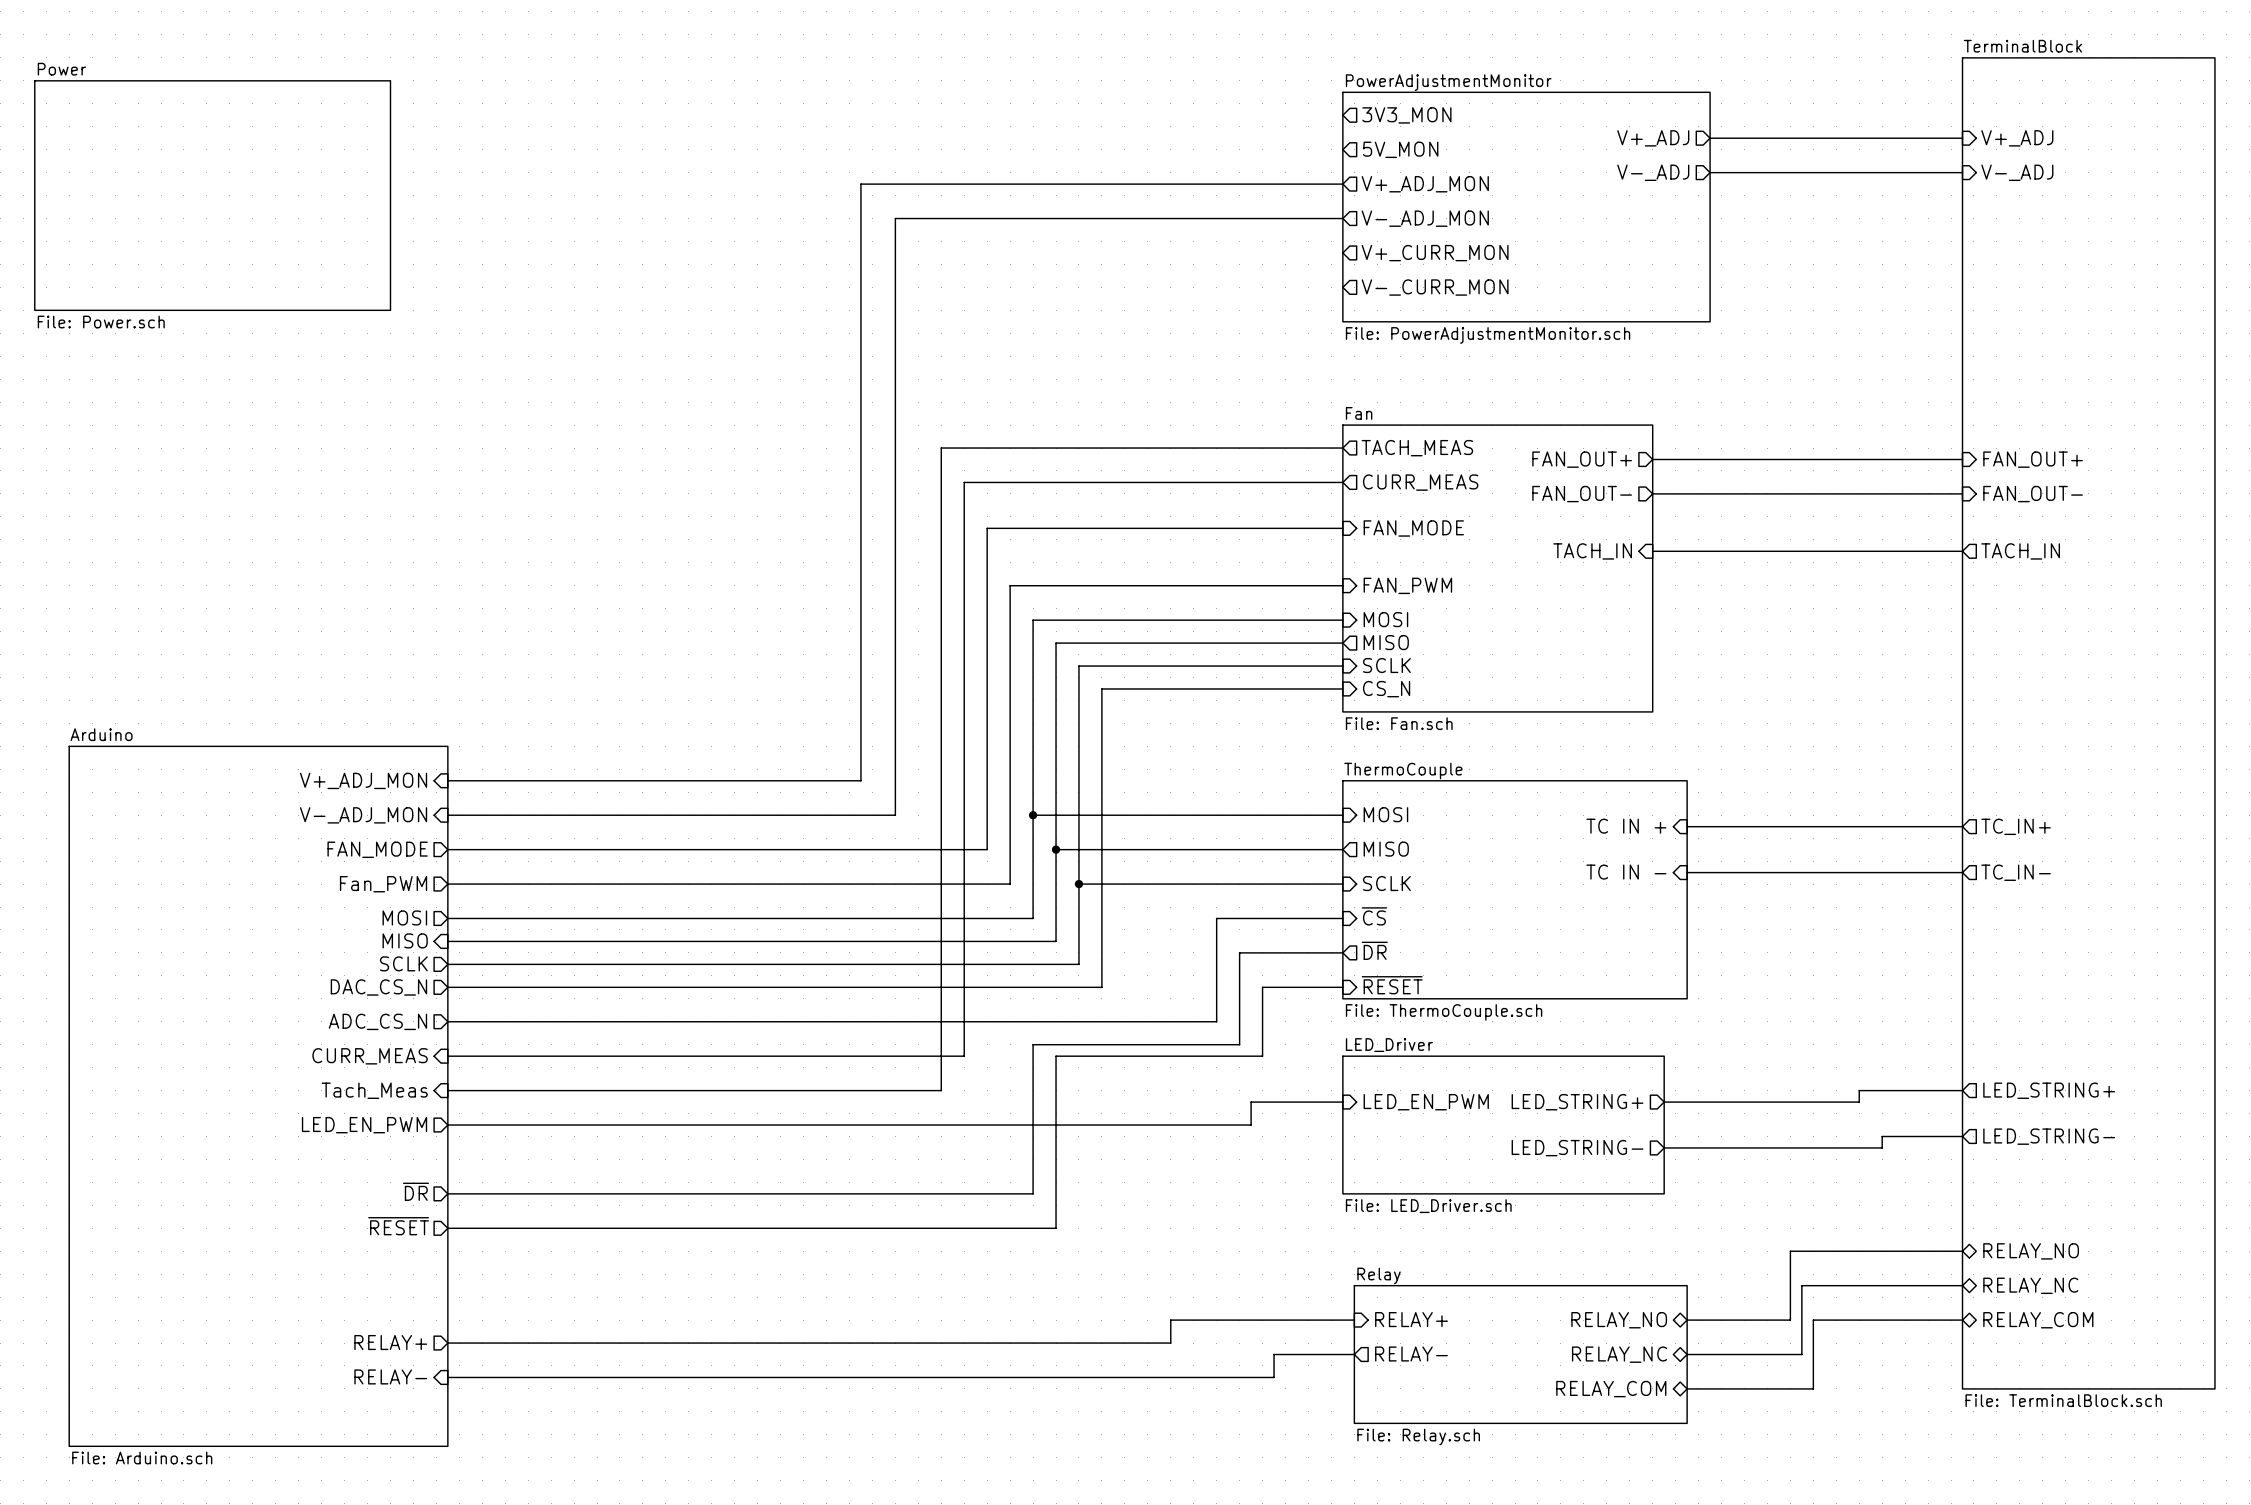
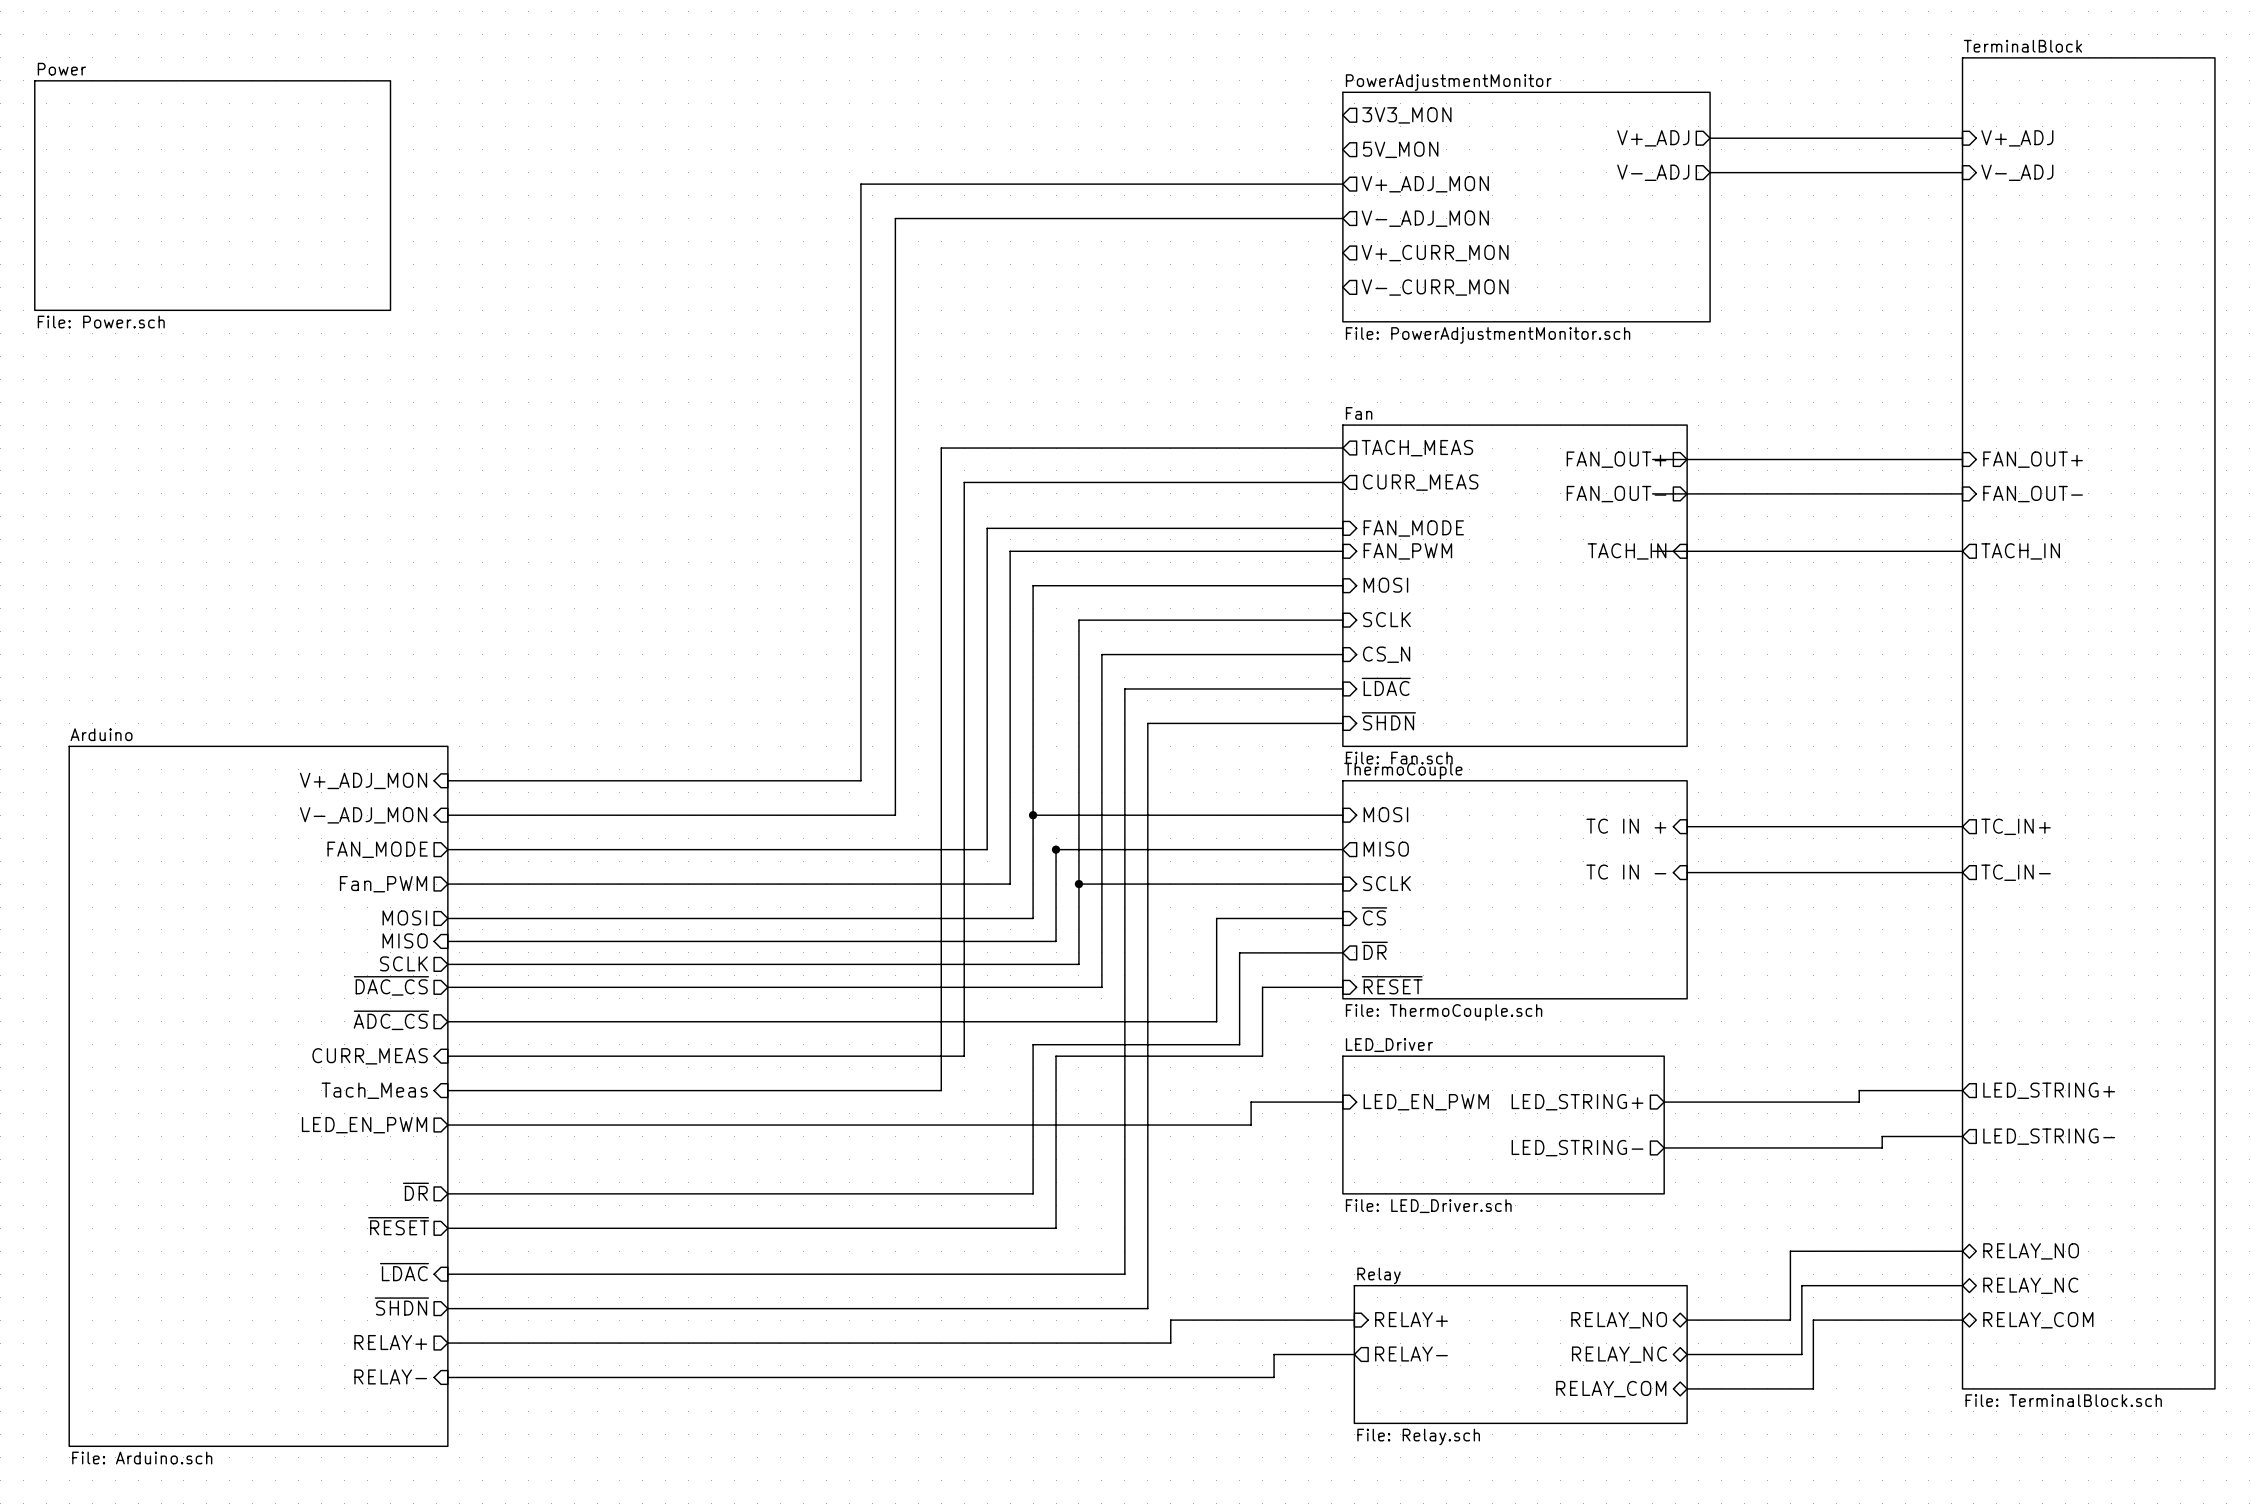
sheet pin position: FAN_OUT+ (1582, 459) -> FAN_OUT+ (1616, 459)
sheet pin position: FAN_OUT- (1582, 494) -> FAN_OUT- (1616, 494)
wire: none -> (1342, 551) (1010, 551) (1010, 585)
sheet pin: none -> FAN_PWM (1407, 551)
sheet pin position: TACH_IN (1592, 551) -> TACH_IN (1627, 551)
sheet Fan: File: Fan.sch (1497, 568) -> none
wire: (1010, 585) (1033, 585) -> (1033, 620) (1033, 585)
sheet pin: FAN_PWM (1407, 585) -> MOSI (1385, 585)
sheet Fan: none -> File: Fan.sch (1515, 585)
sheet pin: MOSI (1385, 619) -> SCLK (1386, 619)
wire: (1033, 620) (1078, 620) -> (1078, 666) (1078, 620)
sheet pin: MISO (1386, 642) -> none
wire: (1342, 643) (1056, 643) (1056, 849) -> none
sheet pin: none -> CS_N (1386, 654)
sheet pin: SCLK (1386, 665) -> none
wire: (1078, 666) (1342, 666) -> none
wire: (1101, 688) (1124, 688) -> (1101, 688) (1101, 654) (1342, 654)
wire: none -> (1124, 688) (1124, 1274) (447, 1274)
sheet pin: CS_N (1386, 689) -> ~{LDAC} (1386, 686)
sheet pin: none -> ~{SHDN} (1388, 721)
wire: none -> (1342, 723) (1147, 723) (1147, 1308) (447, 1308)
sheet pin: DAC_CS_N (378, 987) -> ~{DAC_CS} (391, 985)
sheet pin: ADC_CS_N (377, 1021) -> ~{ADC_CS} (391, 1020)
sheet pin: none -> ~{LDAC} (404, 1272)
sheet pin: none -> ~{SHDN} (401, 1306)

